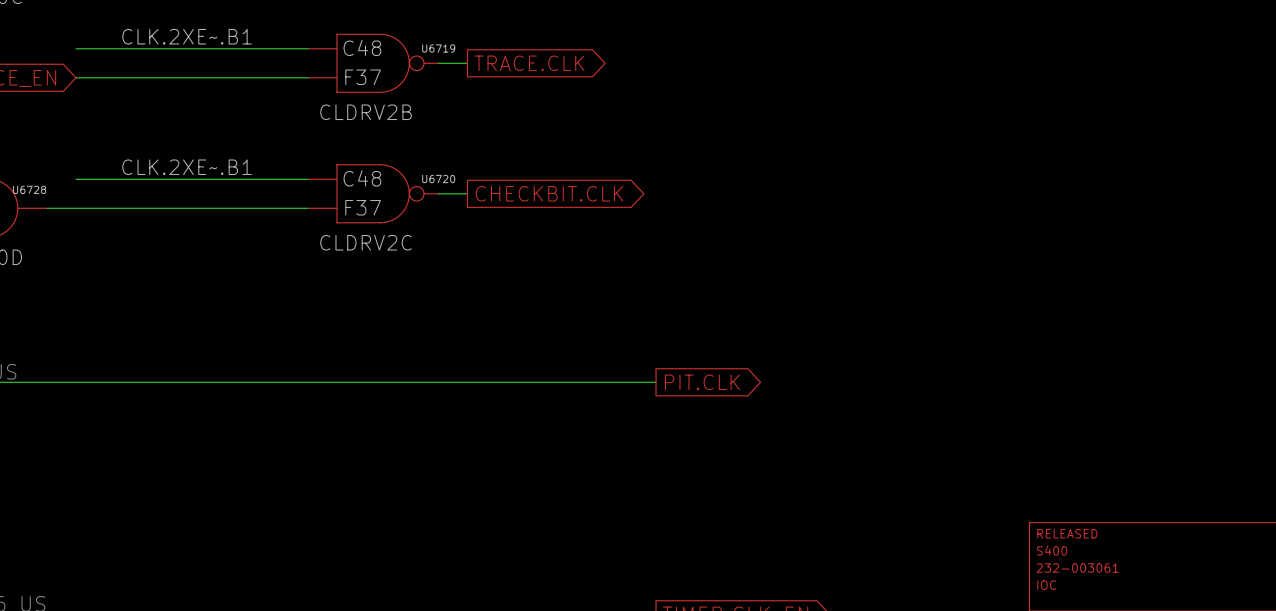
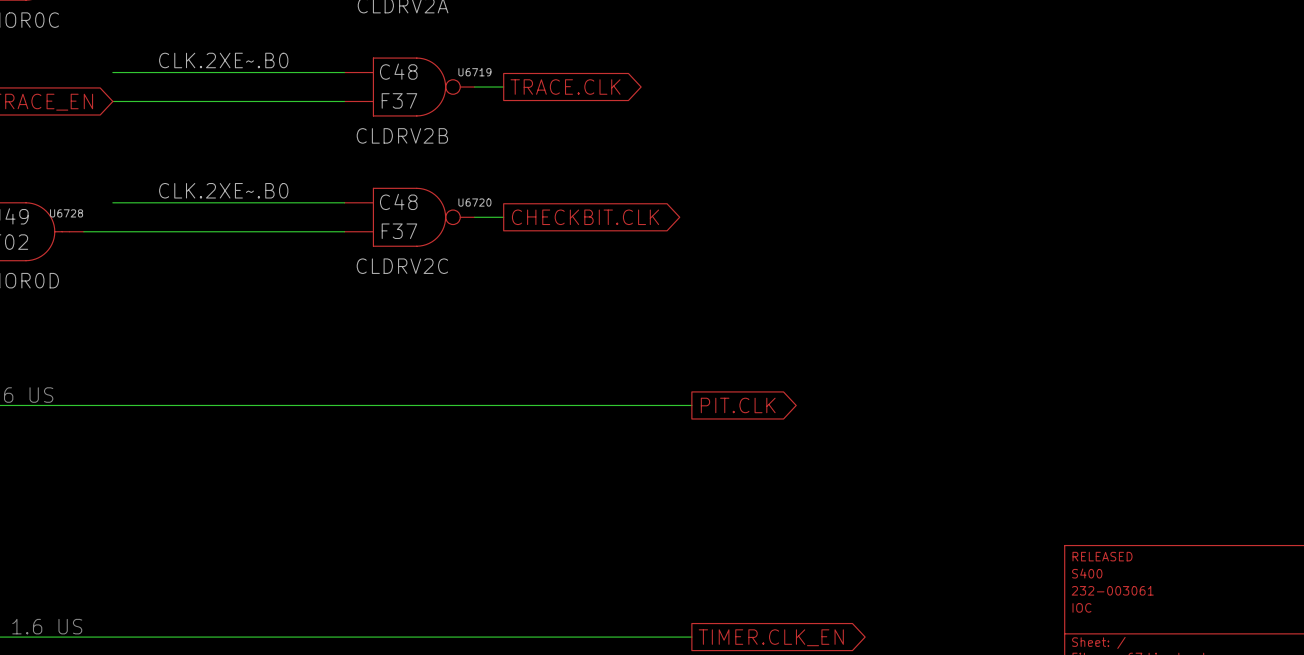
label: CLK.2XE~.B1 (187, 36) -> CLK.2XE~.B0 (223, 60)
label: CLK.2XE~.B1 (187, 167) -> CLK.2XE~.B0 (223, 190)

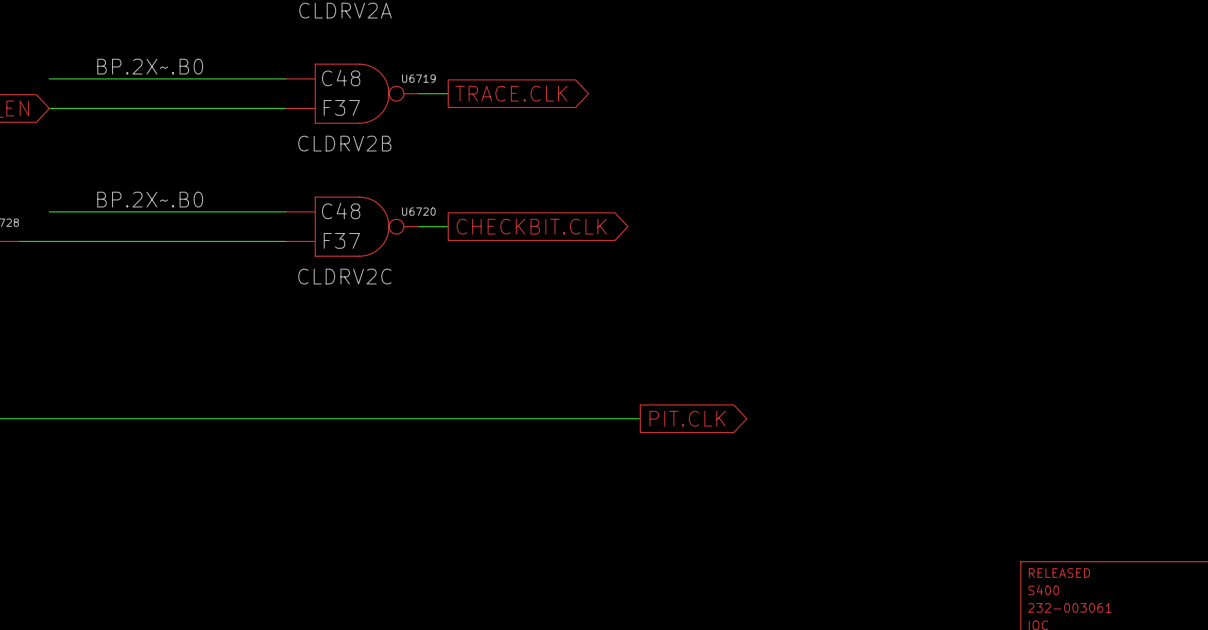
label: CLK.2XE~.B0 (223, 60) -> BP.2X~.B0 (150, 66)
label: CLK.2XE~.B0 (223, 190) -> BP.2X~.B0 (150, 199)

